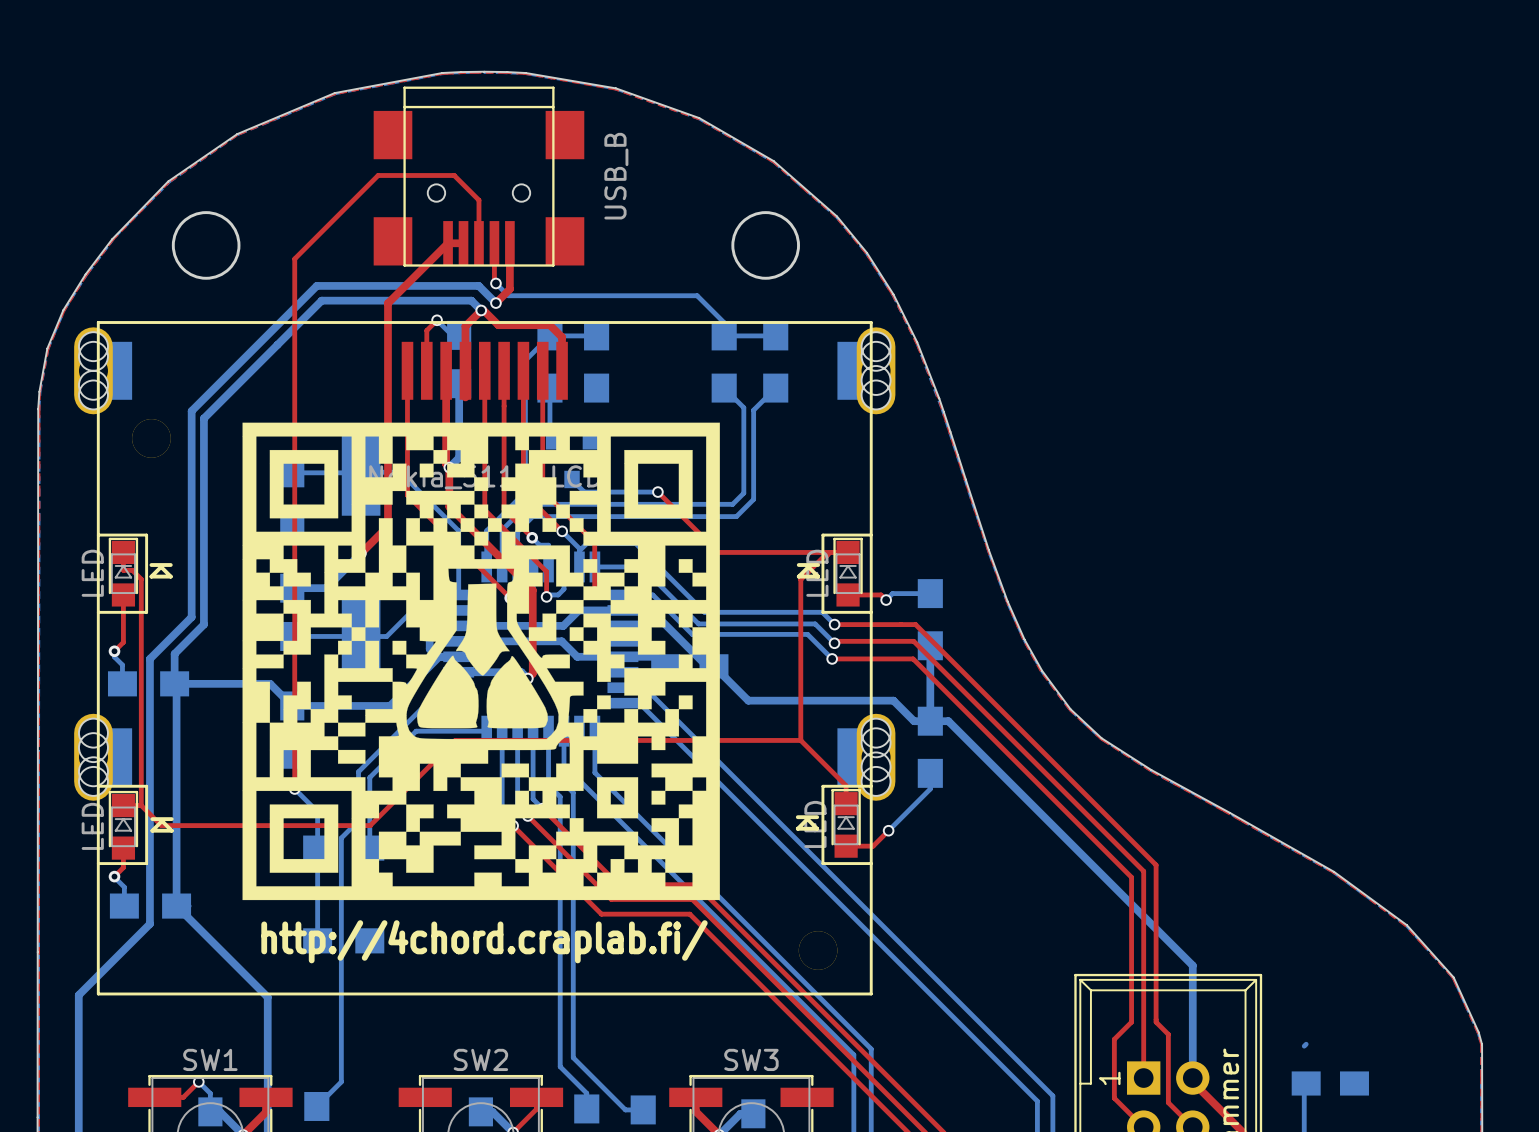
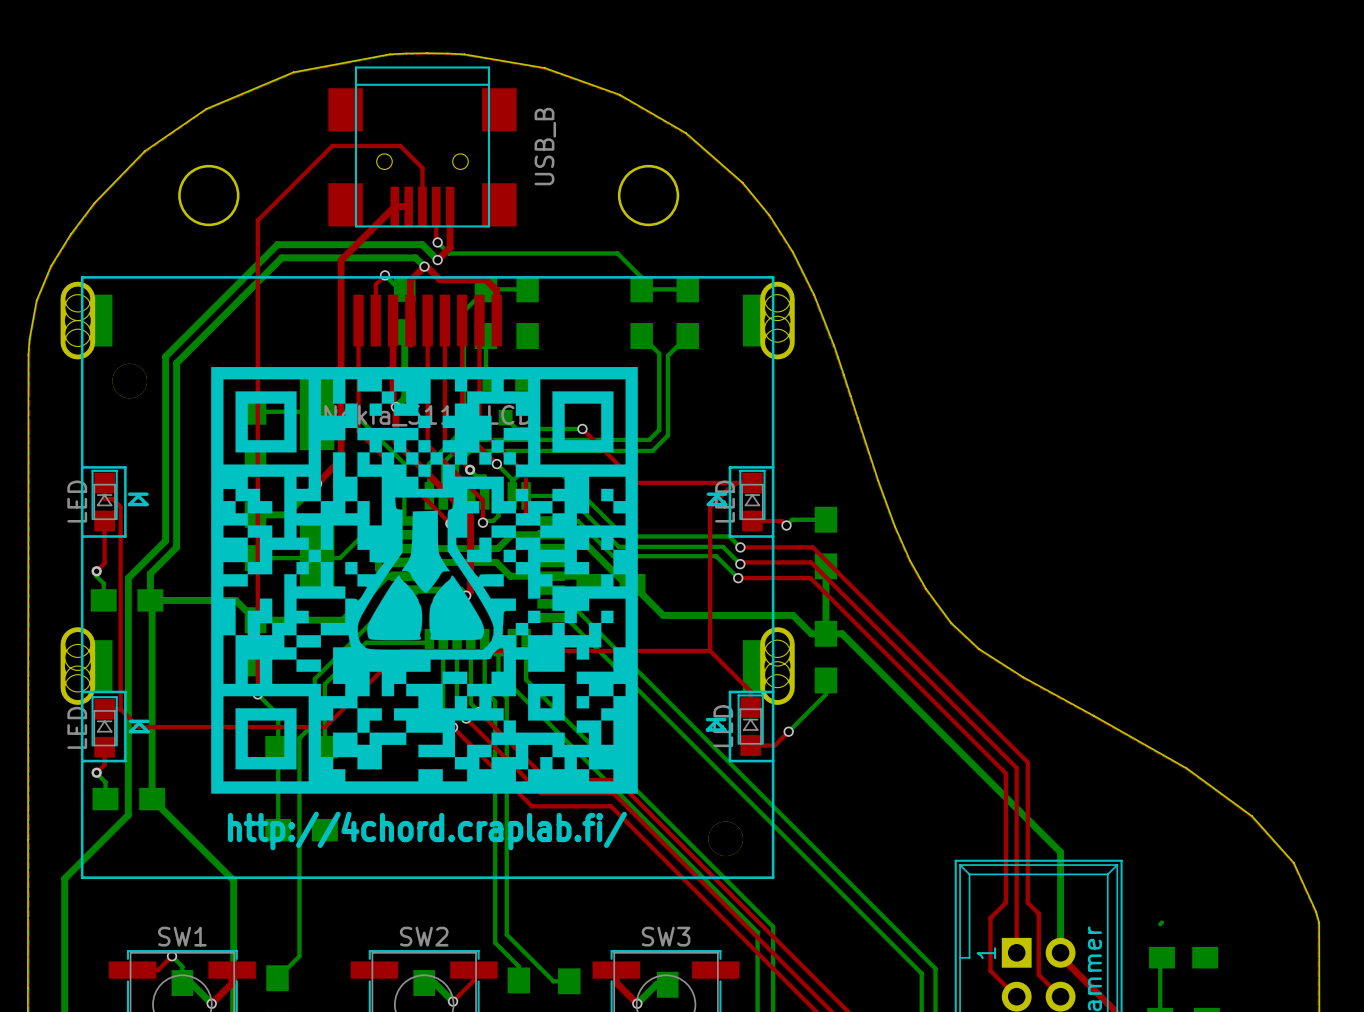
round board edge position: (206, 245) -> (208, 195)
round board edge position: (765, 245) -> (648, 195)

